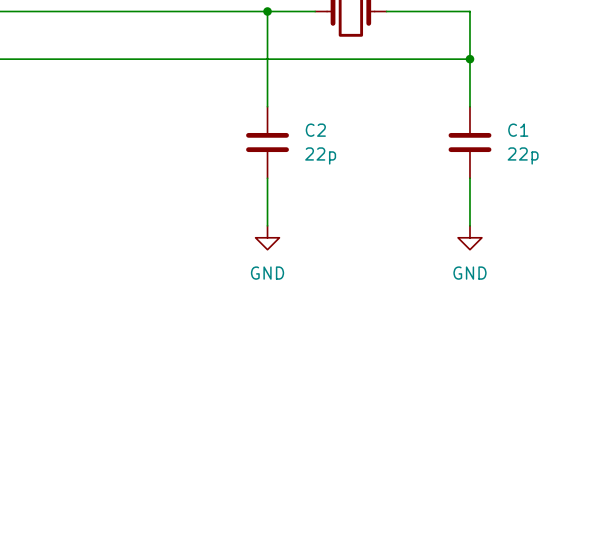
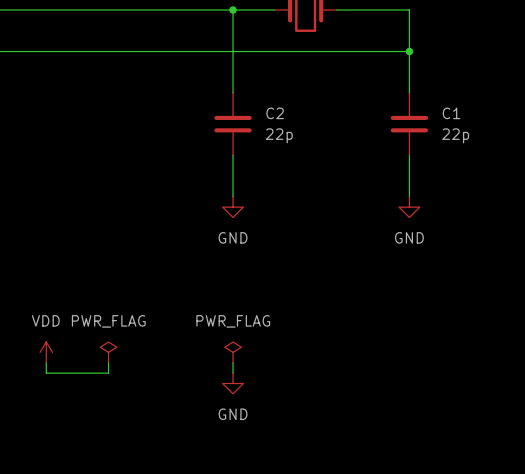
power symbol: none -> VDD (46, 352)
power symbol: none -> PWR_FLAG (108, 352)
power symbol: none -> PWR_FLAG (233, 352)
wire: none -> (46, 362) (46, 373) (108, 373) (108, 362)
wire: none -> (233, 362) (233, 373)
power symbol: none -> GND (233, 383)

